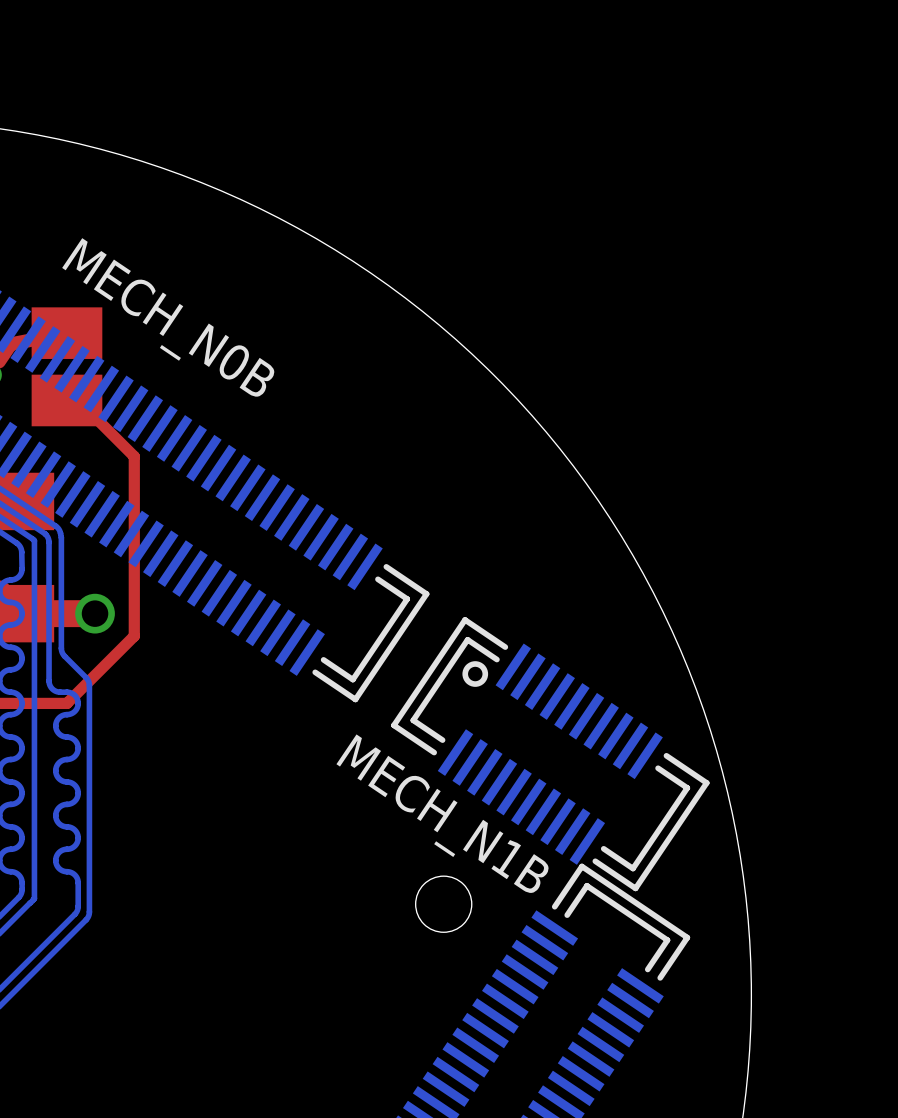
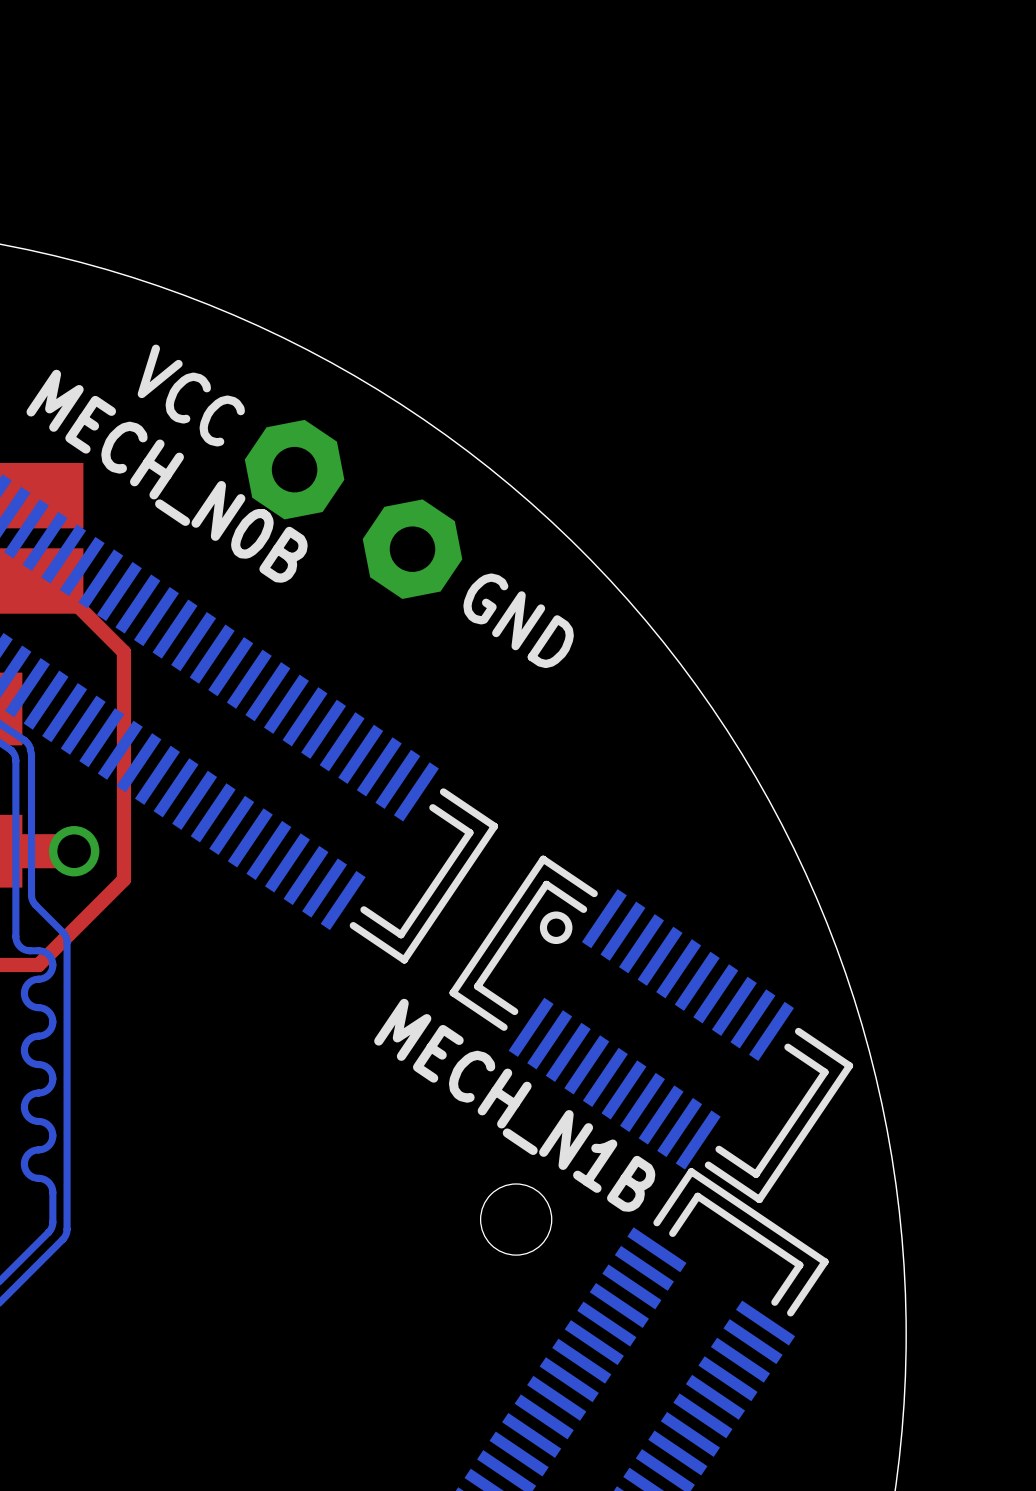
text: none -> VCC (191, 395)
part: none -> (294, 469)
part: none -> (412, 549)
text: none -> GND (518, 620)

